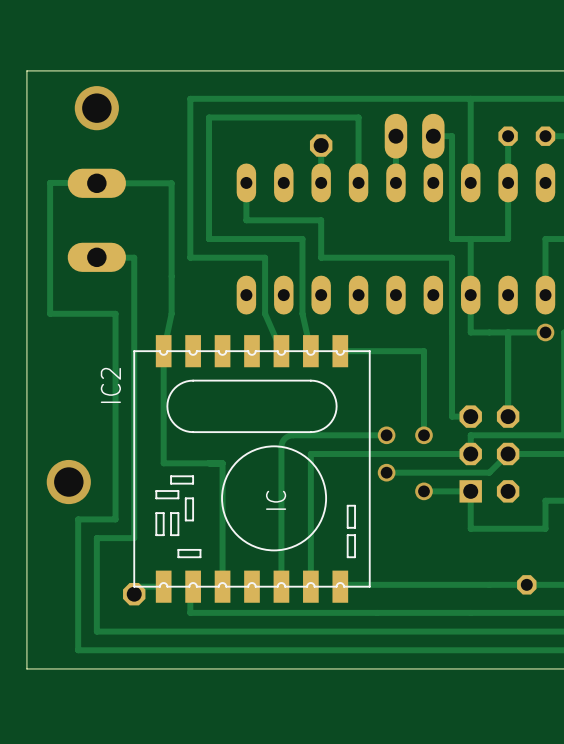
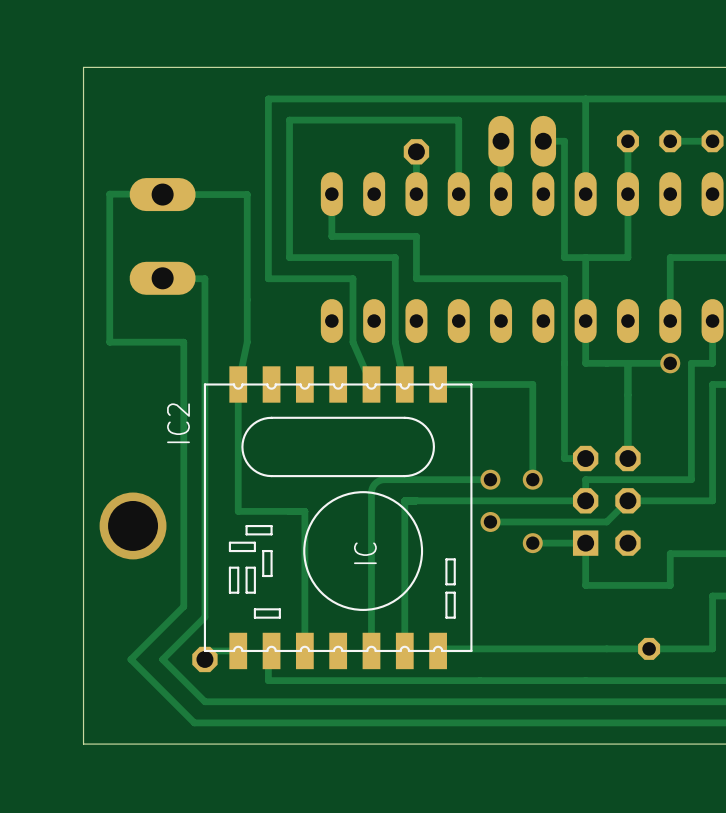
via: (96, 108) -> none
via size: [46, 459, 91, 505] -> [99, 492, 167, 560]
track: (115, 519) (78, 519) (78, 650) (124, 650) -> (183, 574) (183, 606) (130, 659) (194, 722)
track: (134, 538) (96, 538) (96, 631) (134, 631) -> (204, 596) (204, 617) (162, 659) (204, 701)

